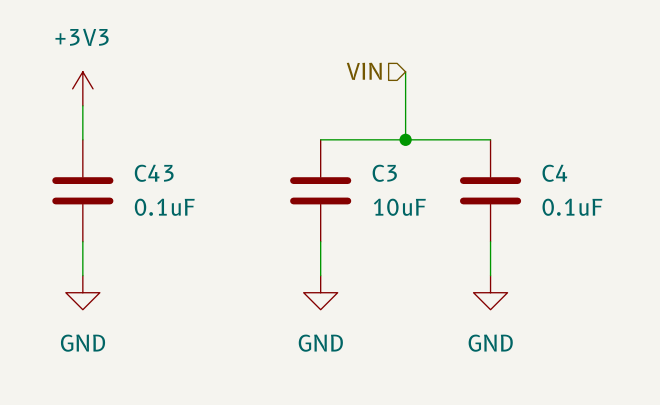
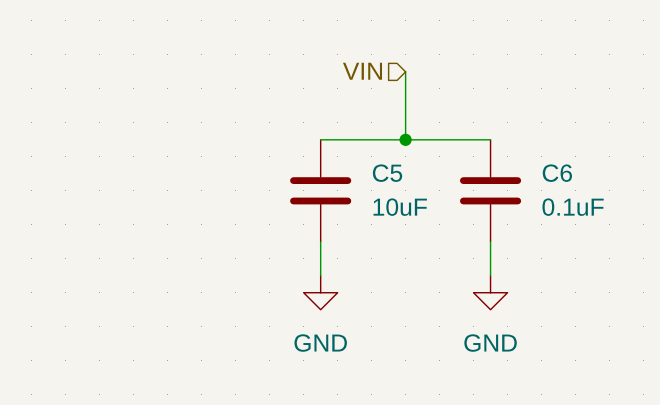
power symbol: +3V3 (82, 88) -> none
wire: (82, 105) (82, 139) -> none
C3 name: C3 (384, 173) -> C5 (387, 173)
C4 name: C4 (554, 173) -> C6 (557, 173)
C43: 0.1uF (82, 190) -> none
wire: (82, 241) (82, 275) -> none
power symbol: GND (82, 292) -> none

